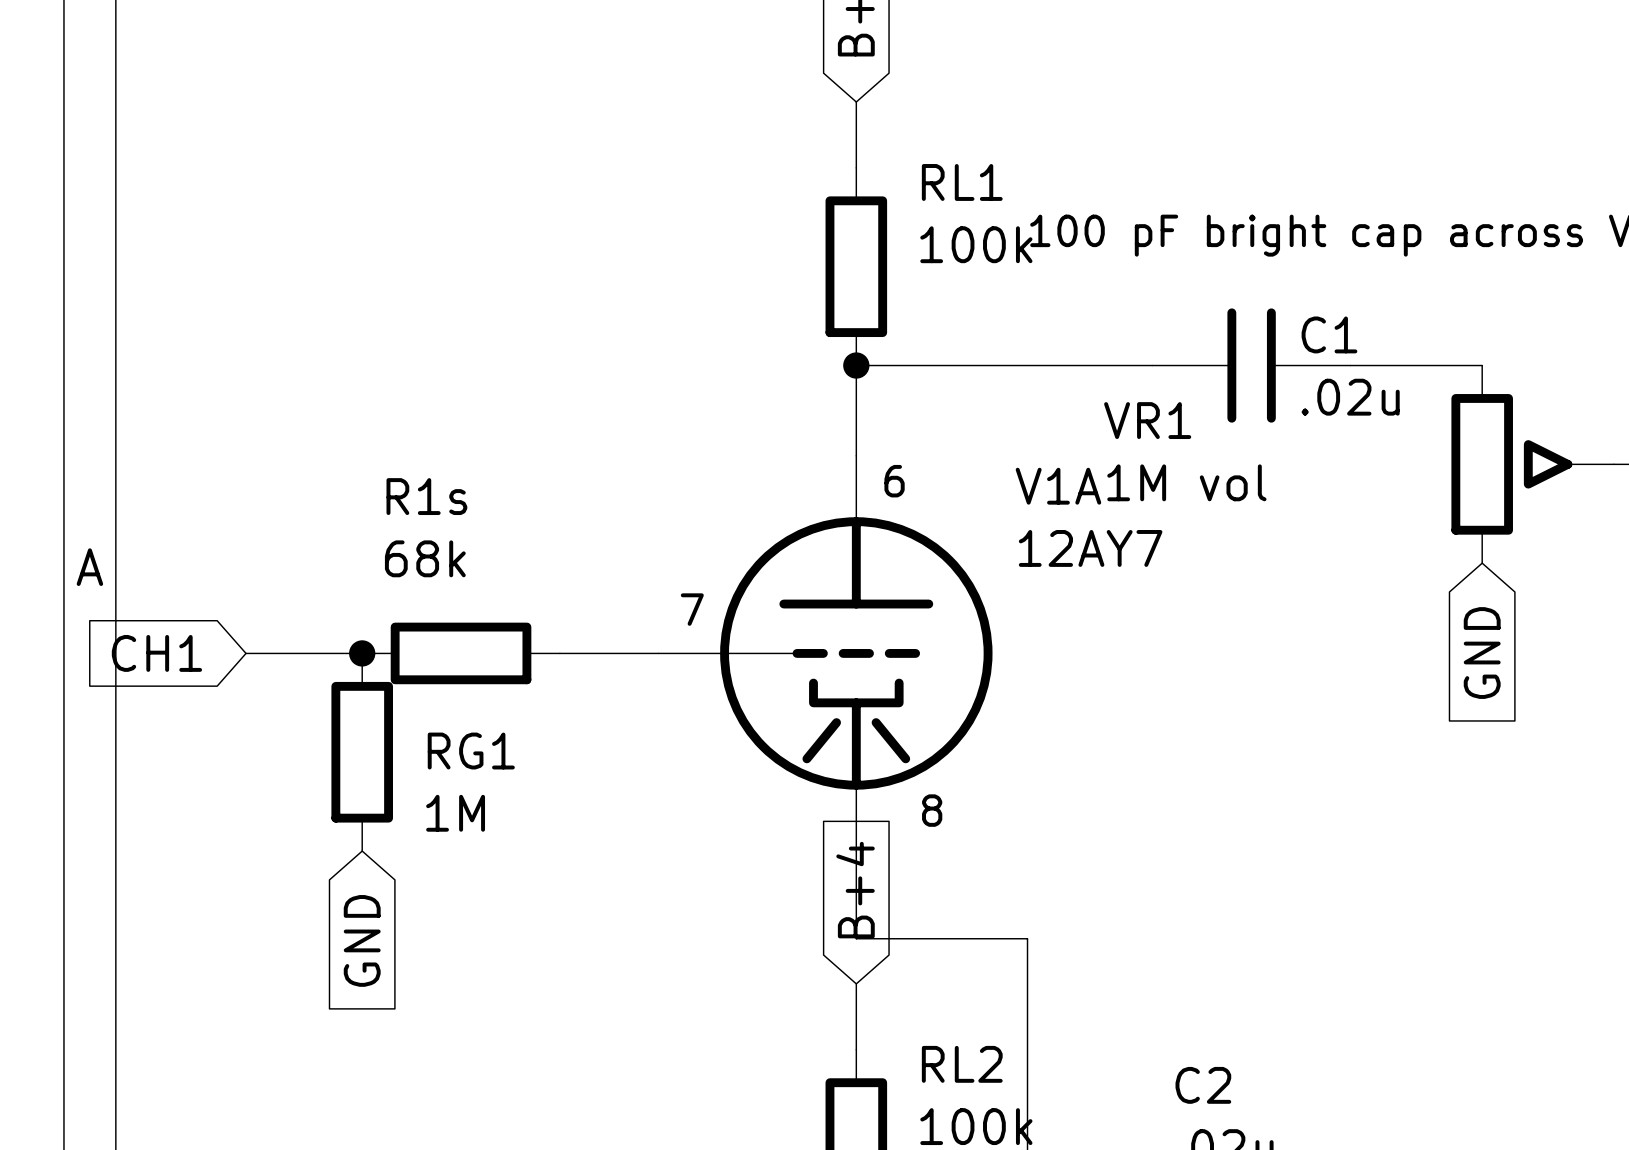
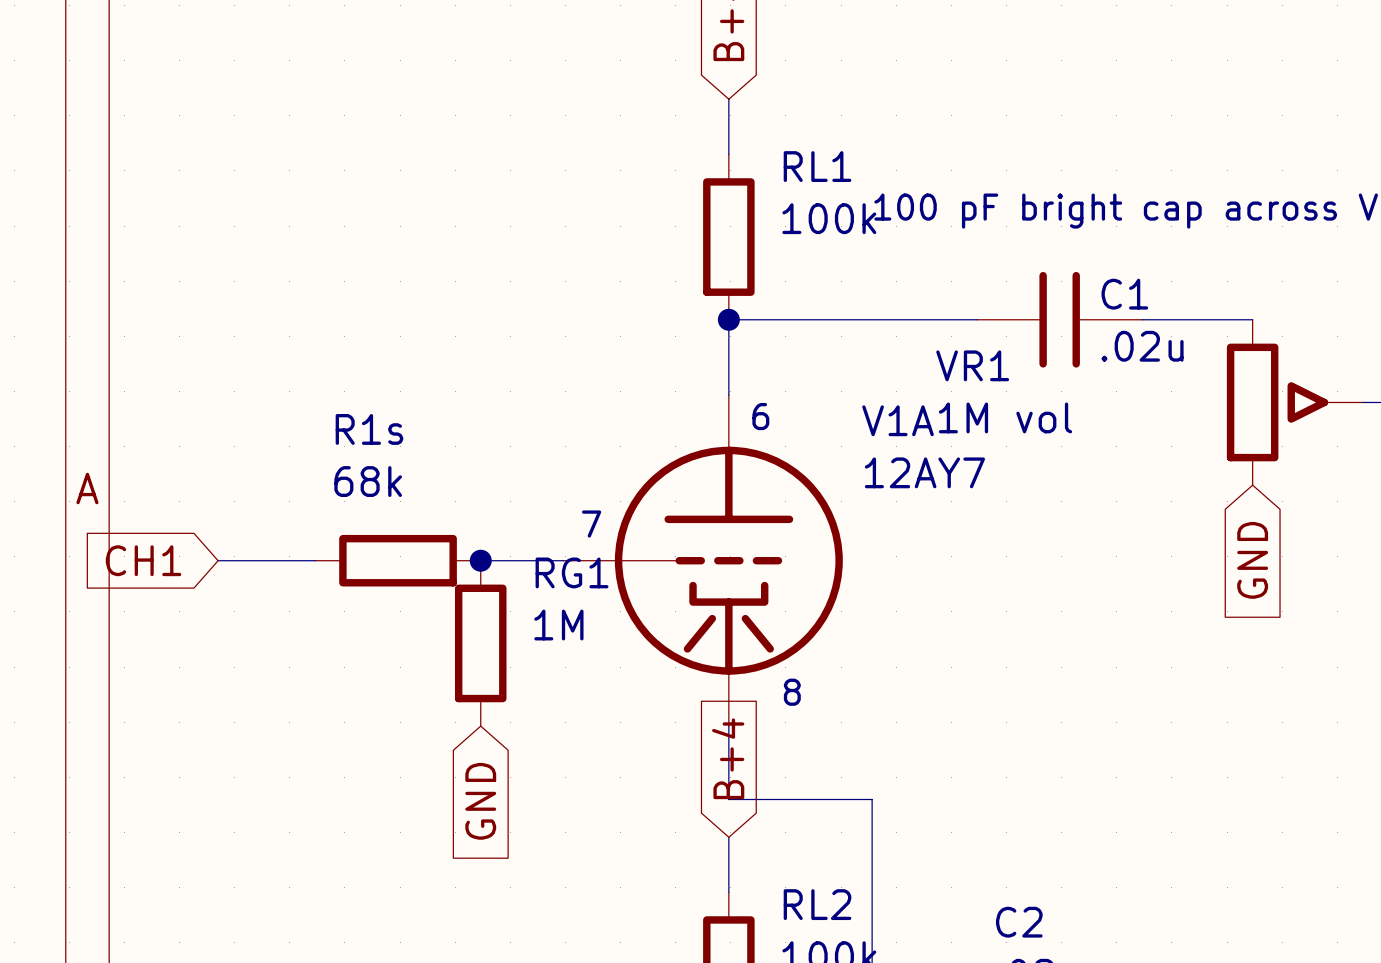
junction: (362, 653) -> none
junction: none -> (480, 560)
RG1 name position: RG1 (471, 751) -> RG1 (572, 572)
RG1 position: (362, 752) -> (480, 643)
RG1 value position: 1M (455, 813) -> 1M (558, 625)
global label position: GND (362, 940) -> GND (480, 801)

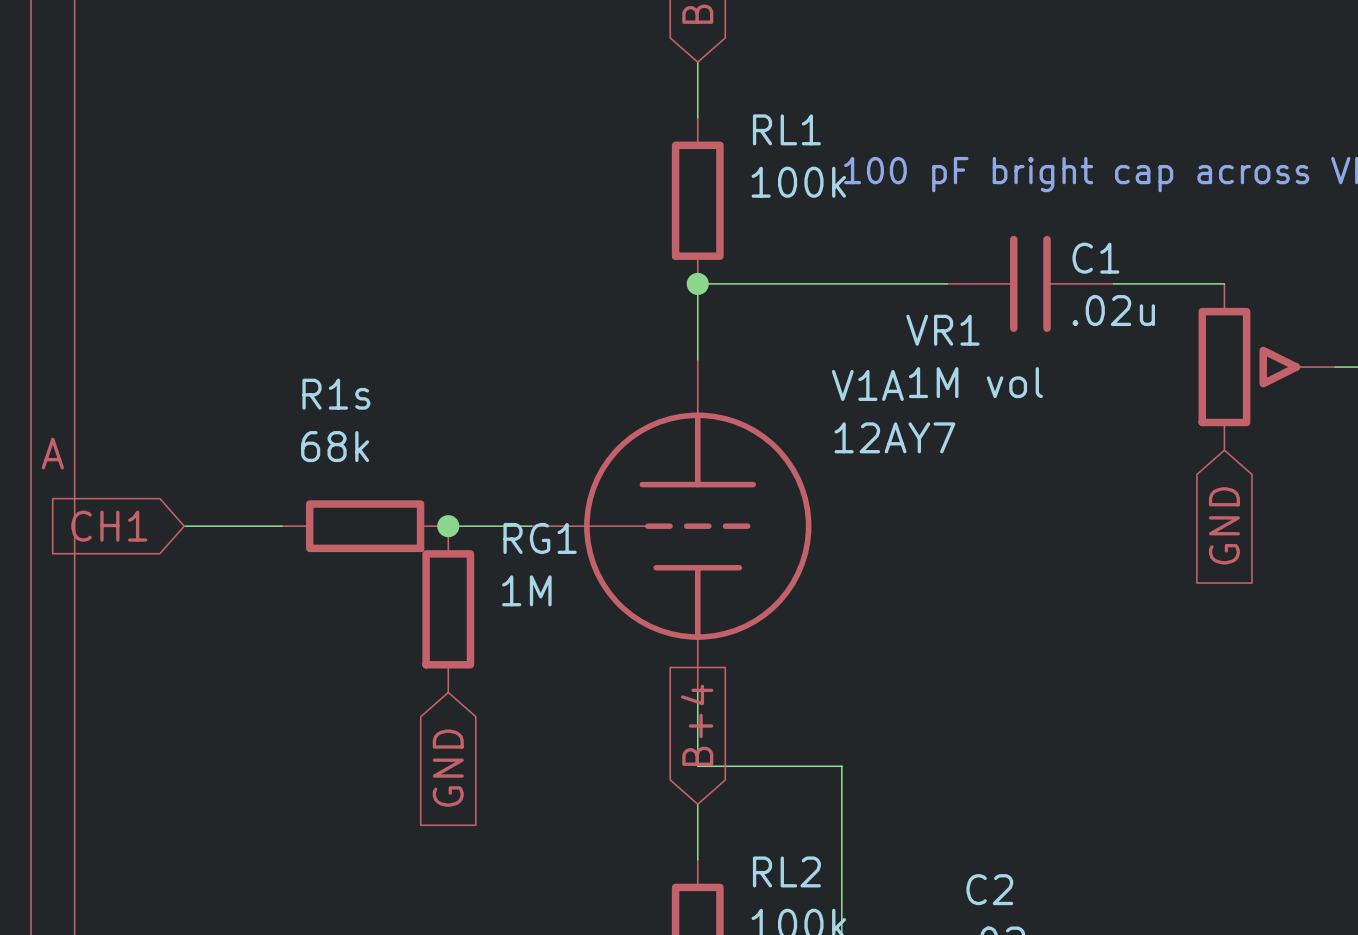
V1A symbol: [563, 395, 843, 727] -> [531, 359, 812, 693]
text: 6 (760, 416) -> none
text: 7 (591, 524) -> none
text: 8 (792, 692) -> none

